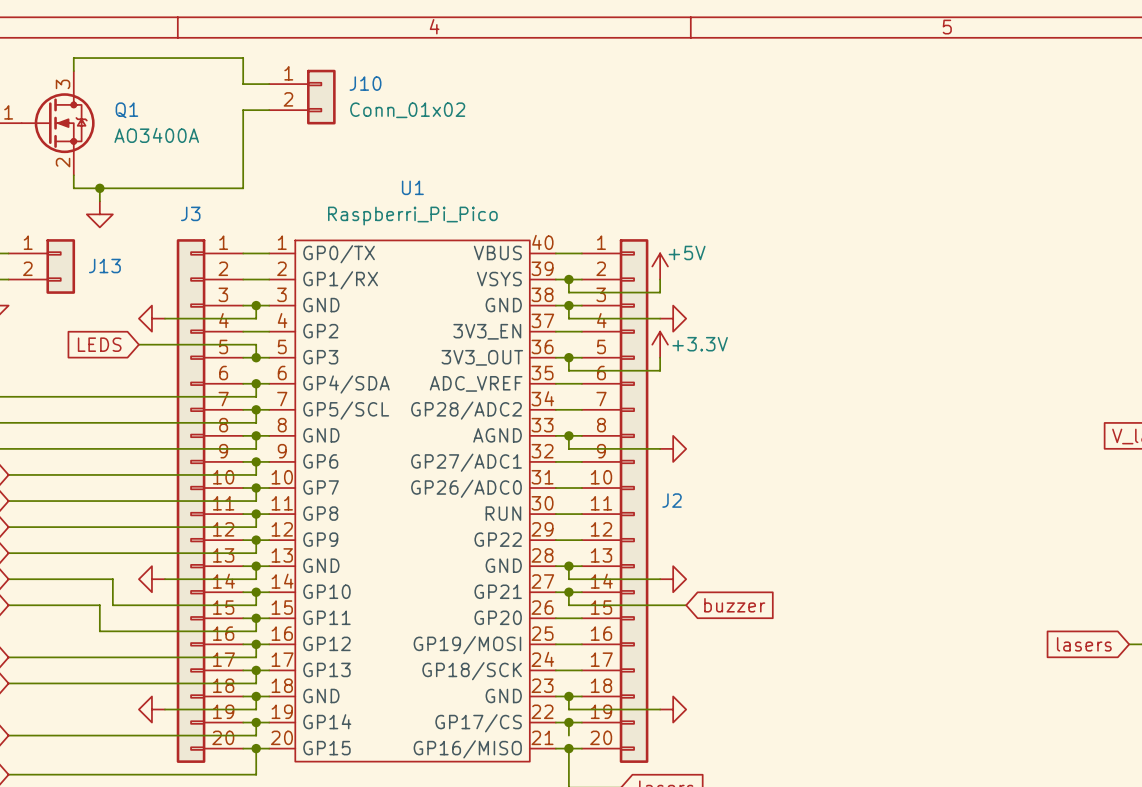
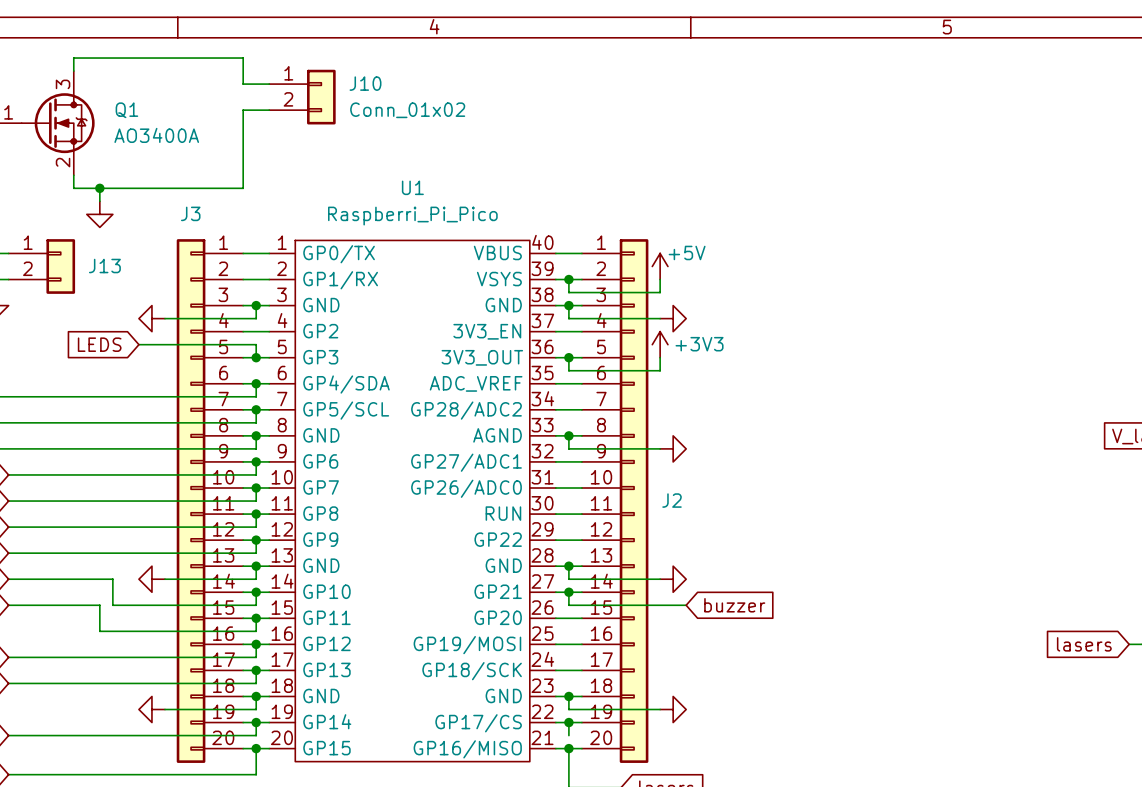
power symbol: +3.3V (660, 344) -> +3V3 (660, 344)

